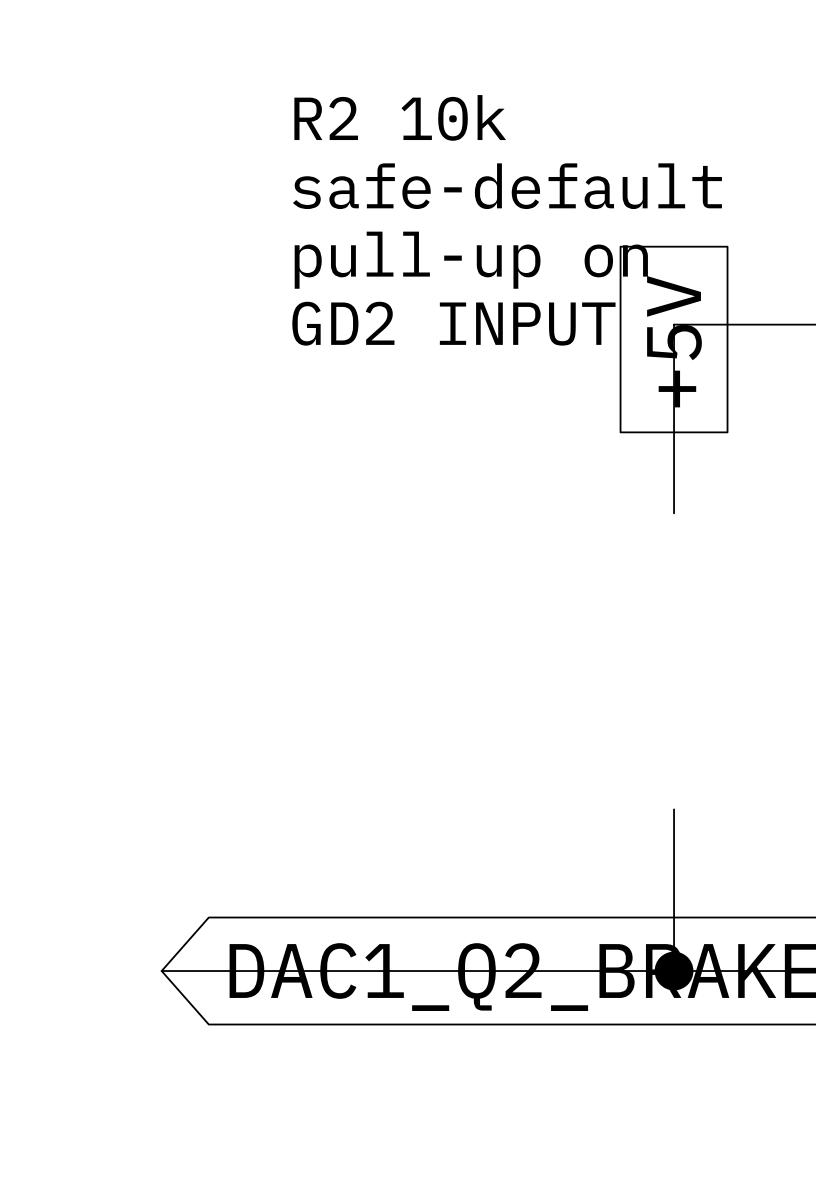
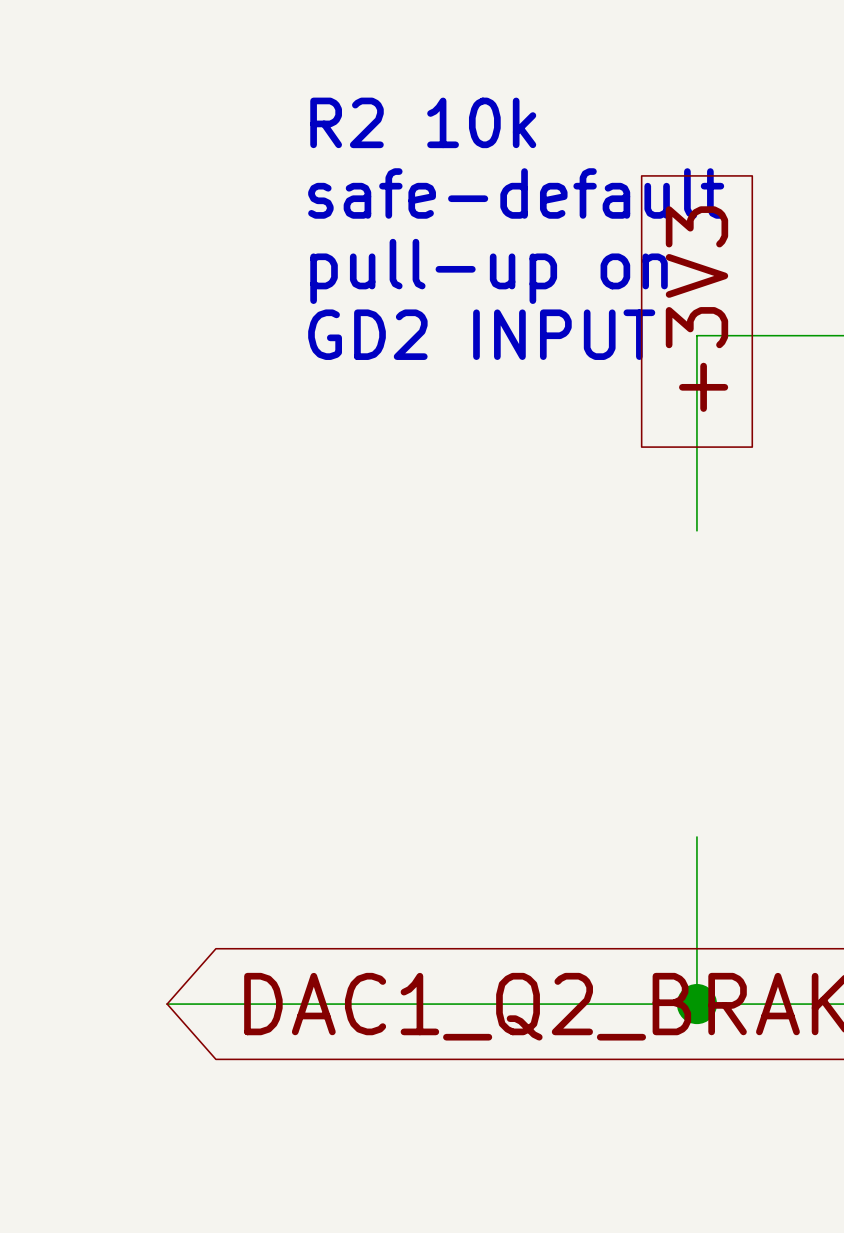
global label: +5V (674, 341) -> +3V3 (696, 309)

